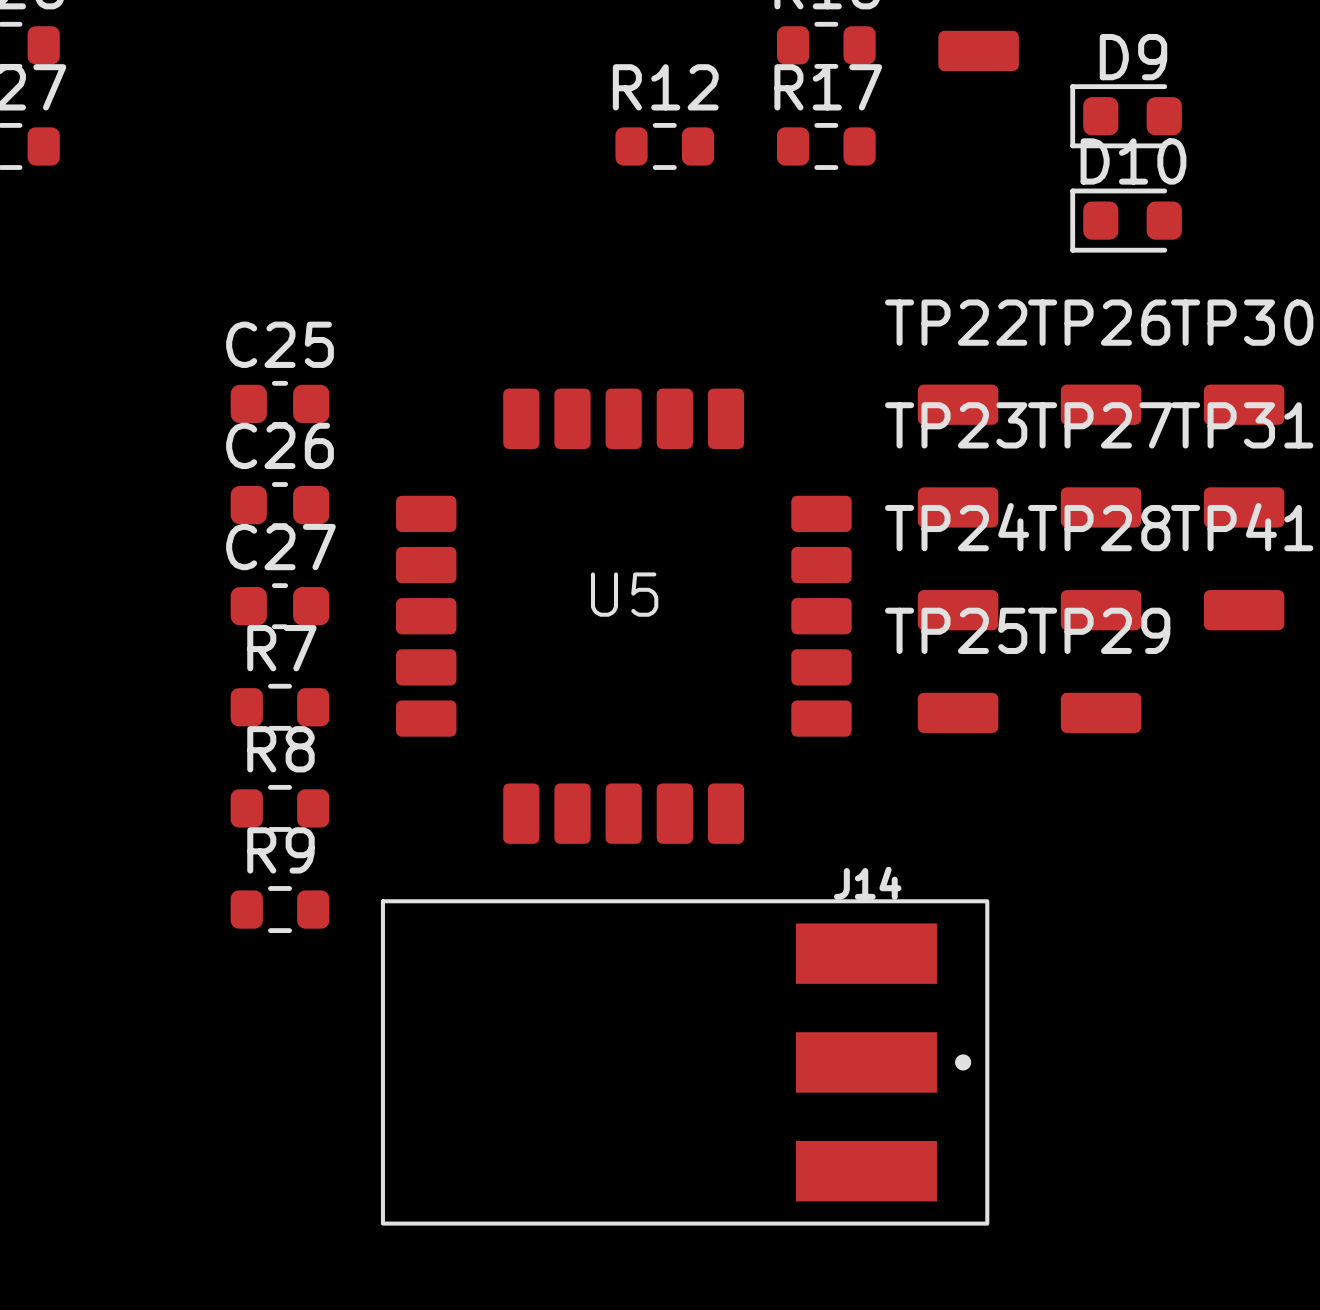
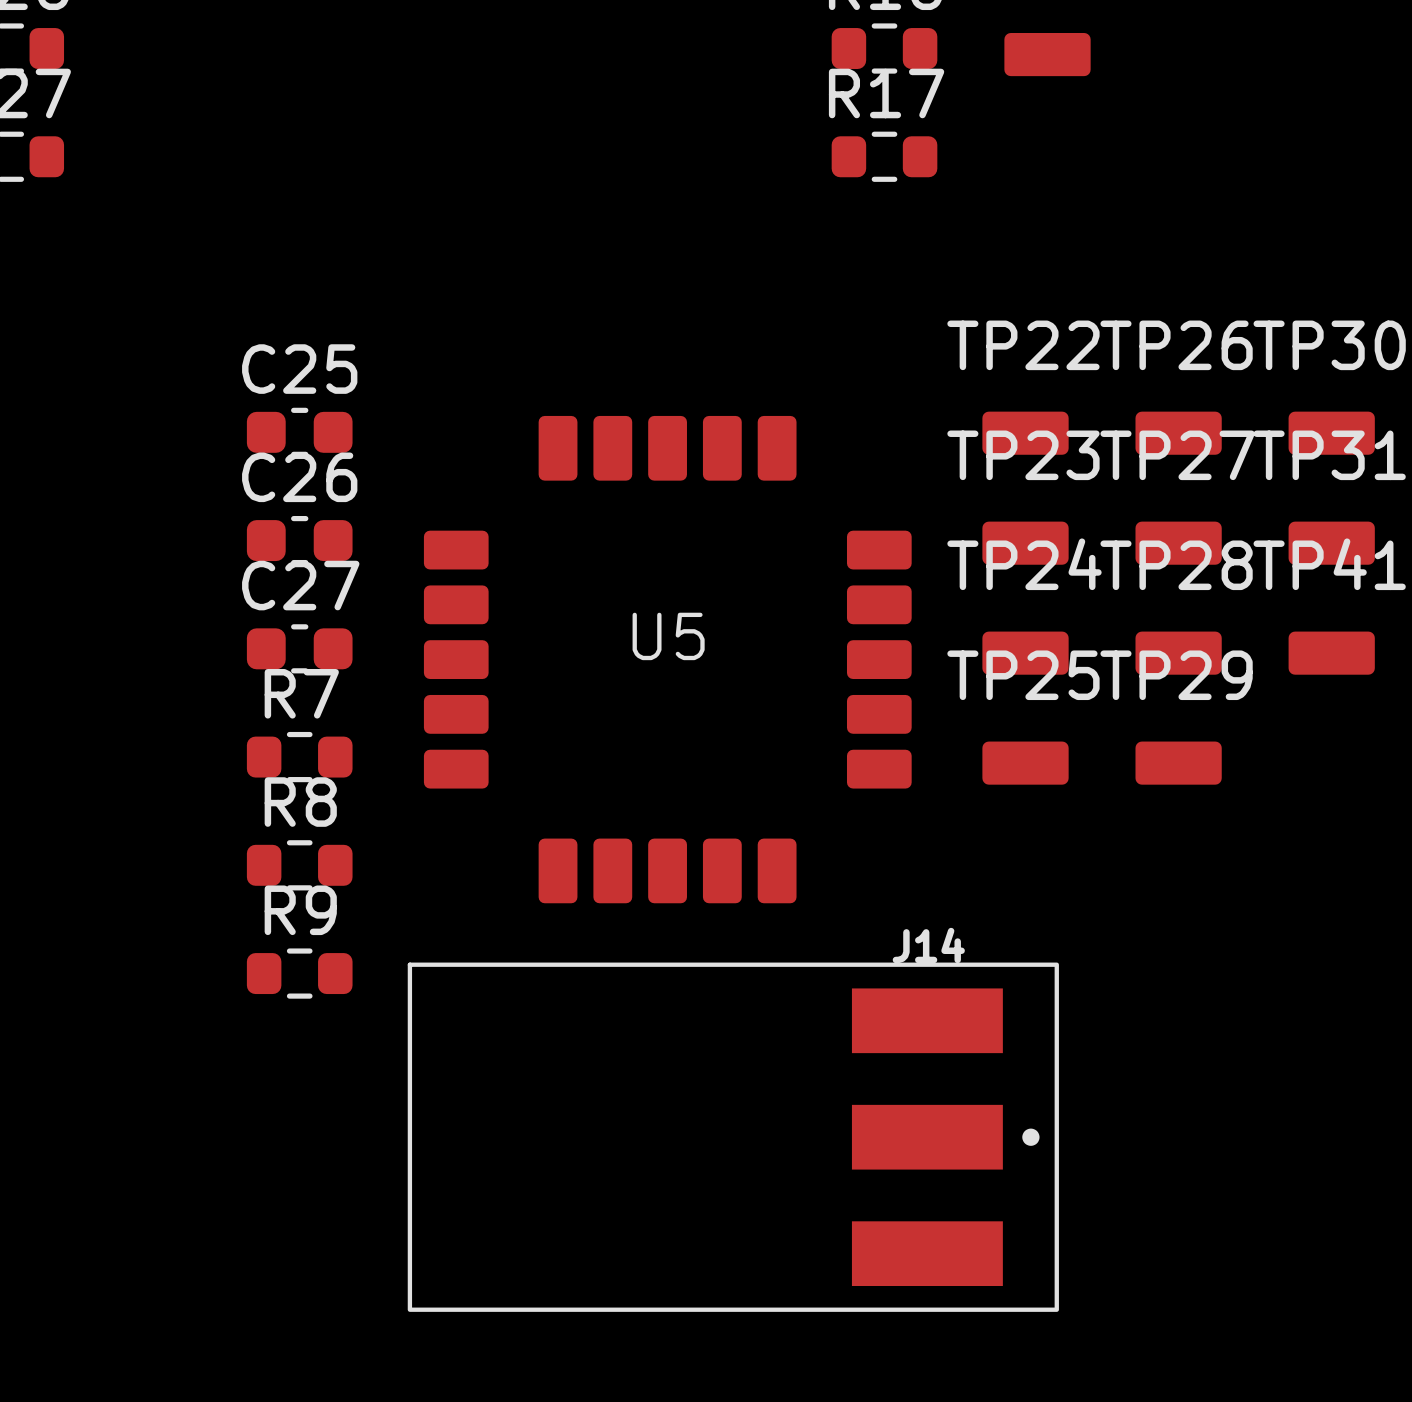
D9: (1126, 116) -> none
R12: (664, 146) -> none
D10: (1126, 220) -> none

